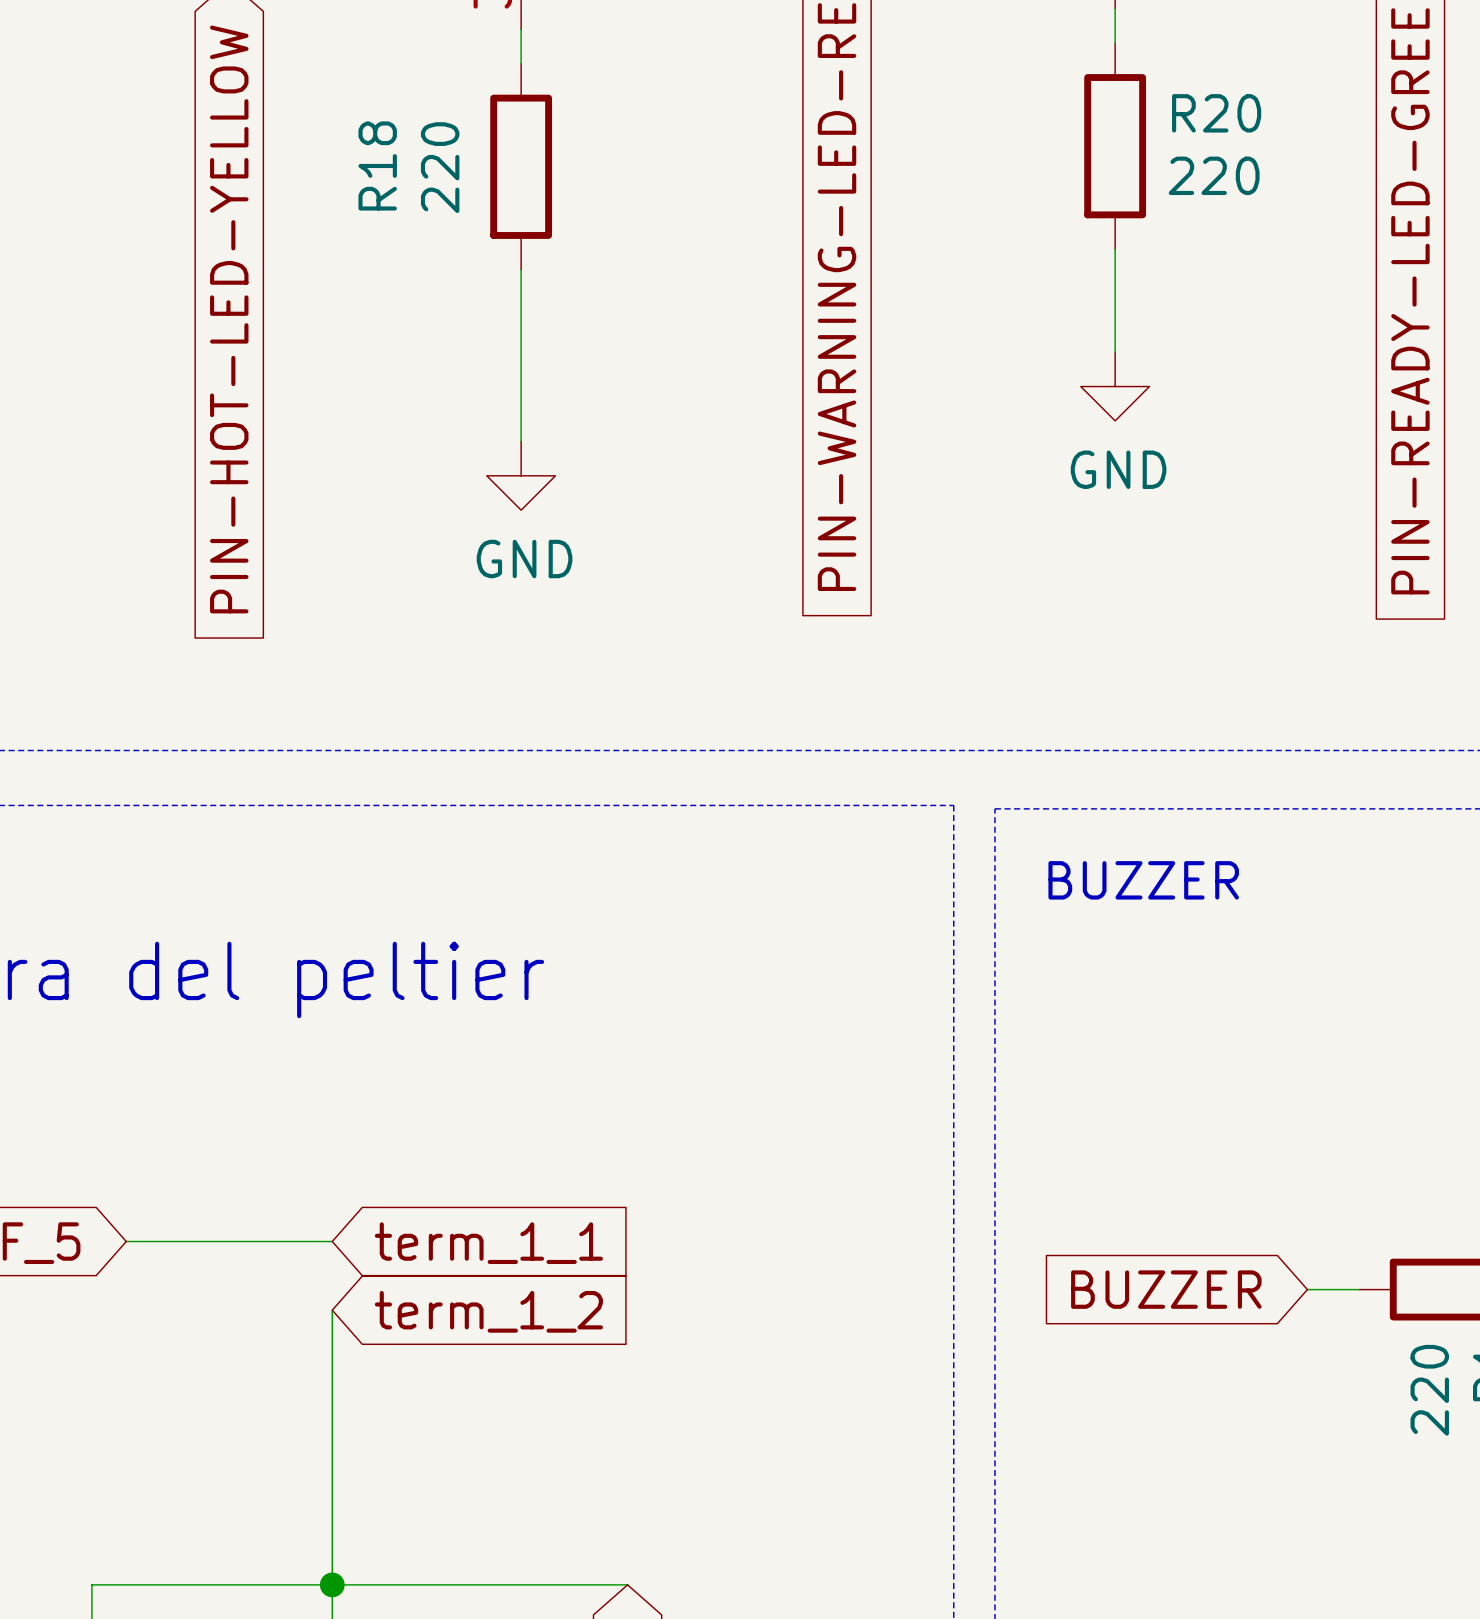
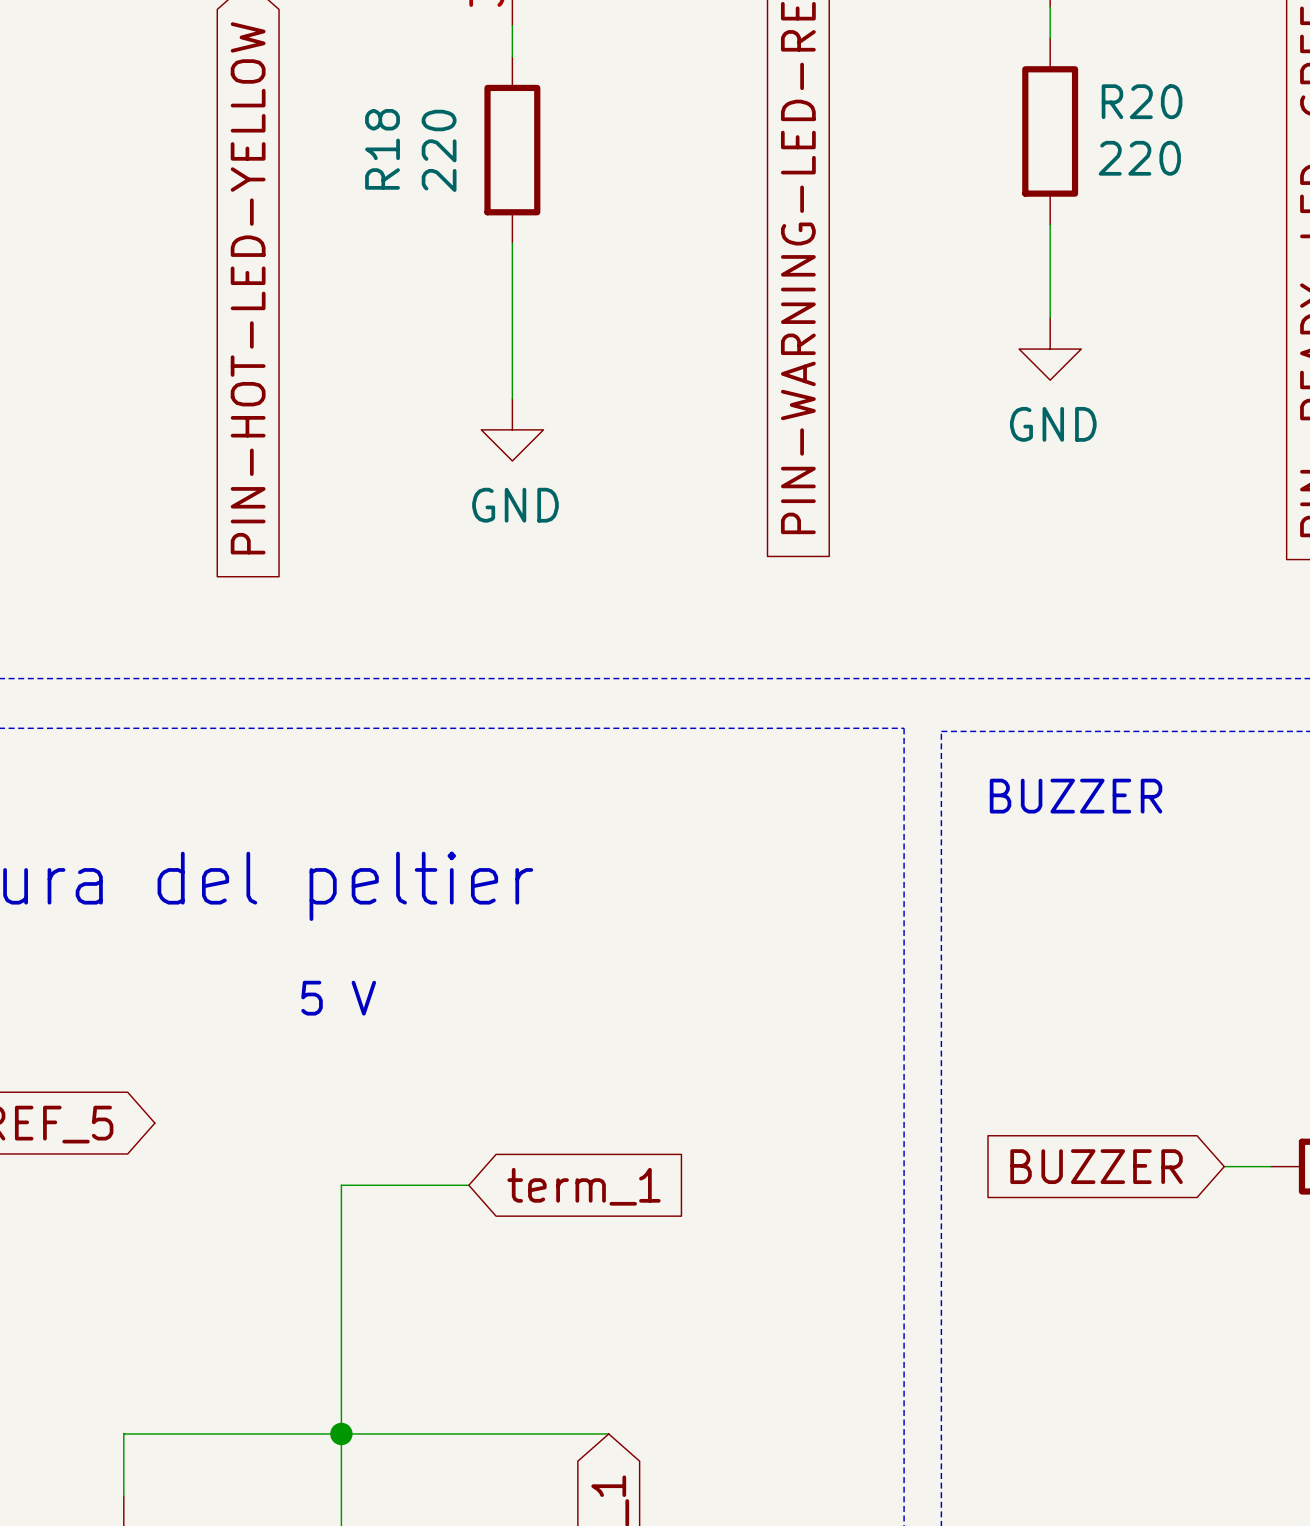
text: none -> 5 V (338, 998)
wire: (126, 1241) (332, 1241) -> none
global label: term_1_1 (488, 1243) -> none
wire: none -> (341, 1185) (468, 1185)
global label: term_1_2 (488, 1311) -> none
global label: none -> term_1 (584, 1186)

